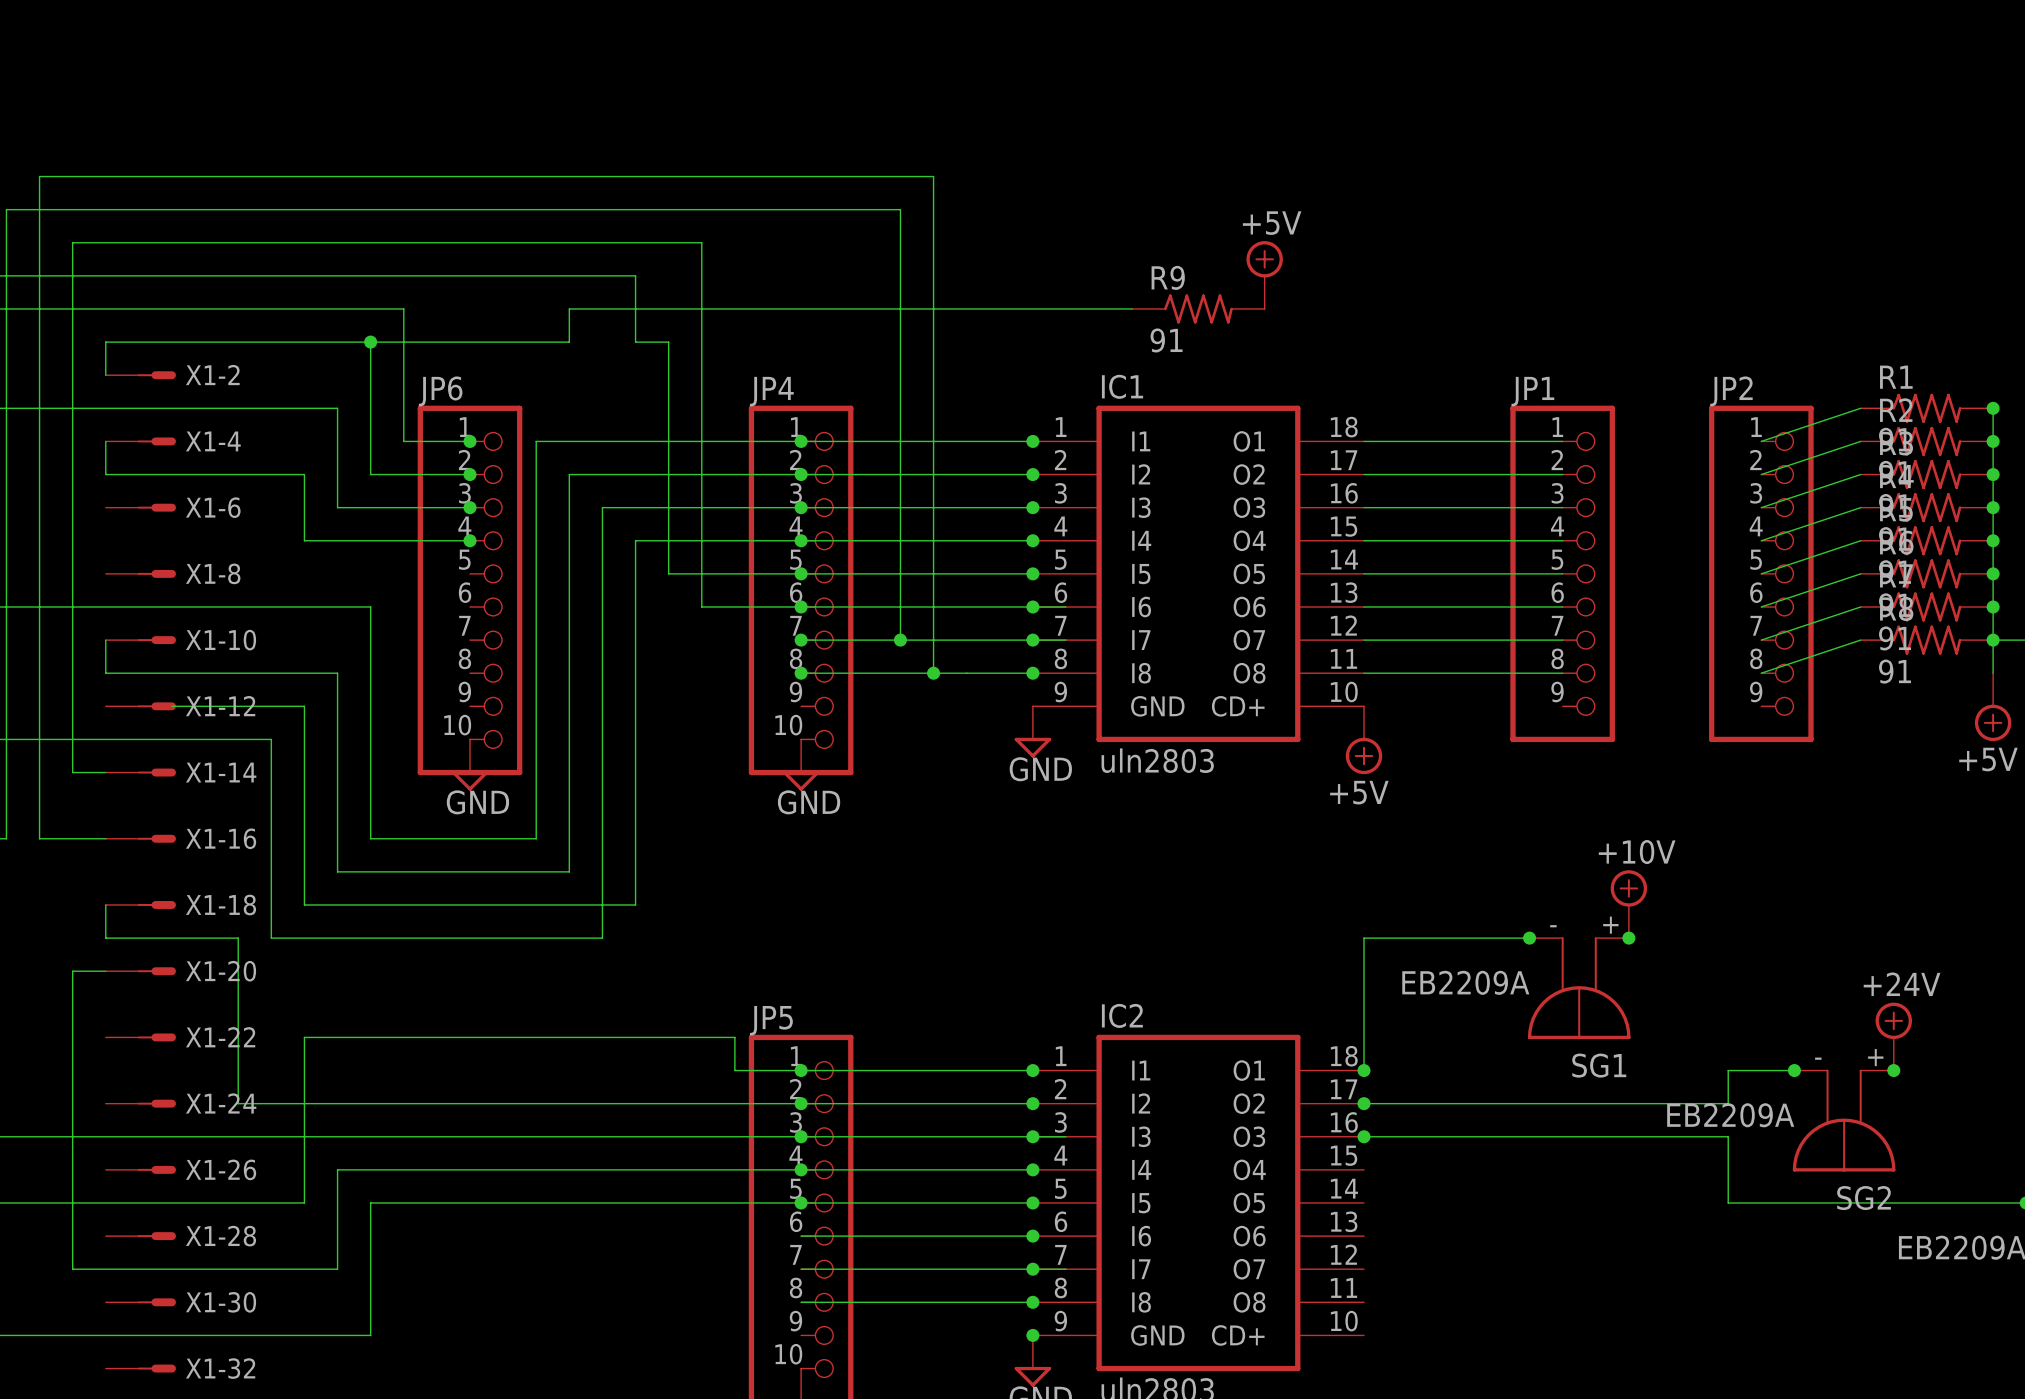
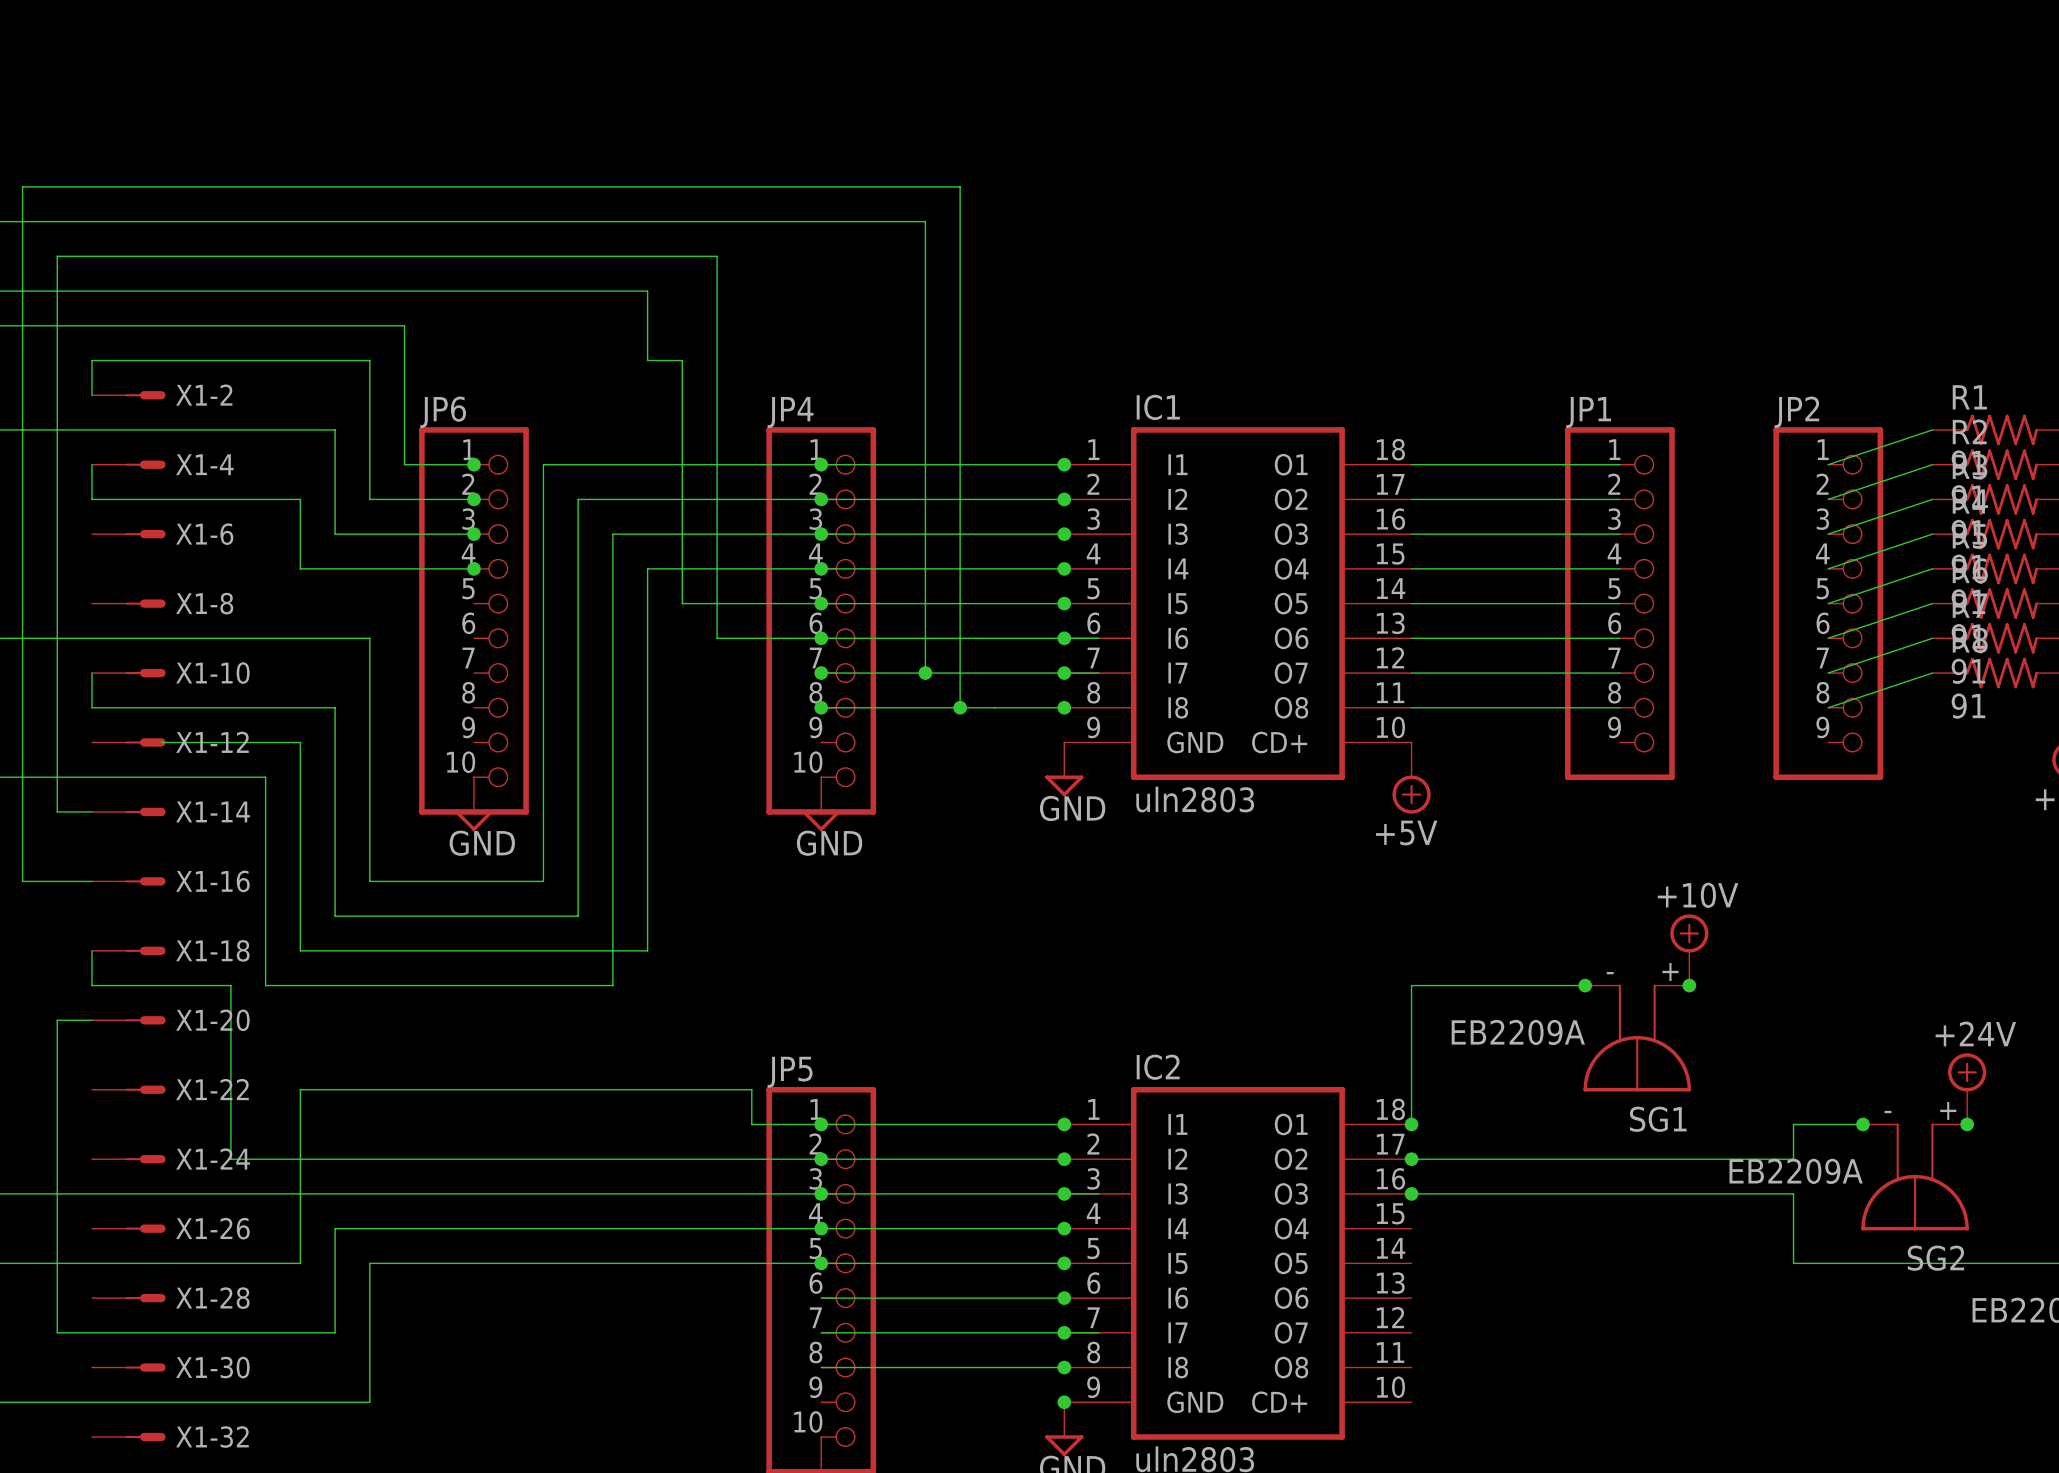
power symbol: +5V (1264, 275) -> none
wire: (1132, 308) (569, 308) (569, 342) (370, 342) -> none
R9: 91 (1198, 308) -> none
junction: (370, 342) -> none

